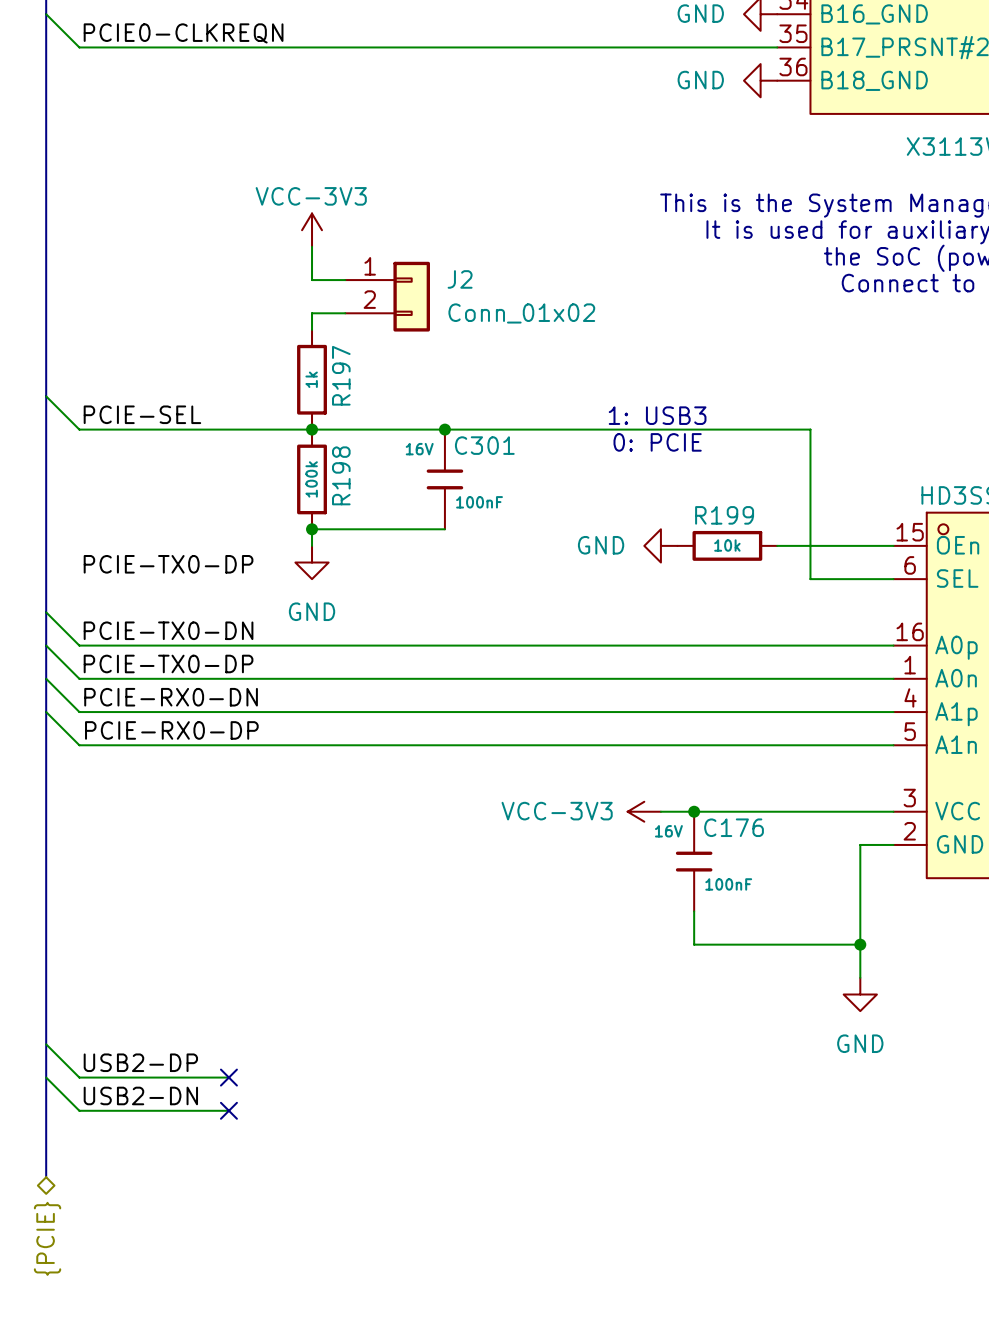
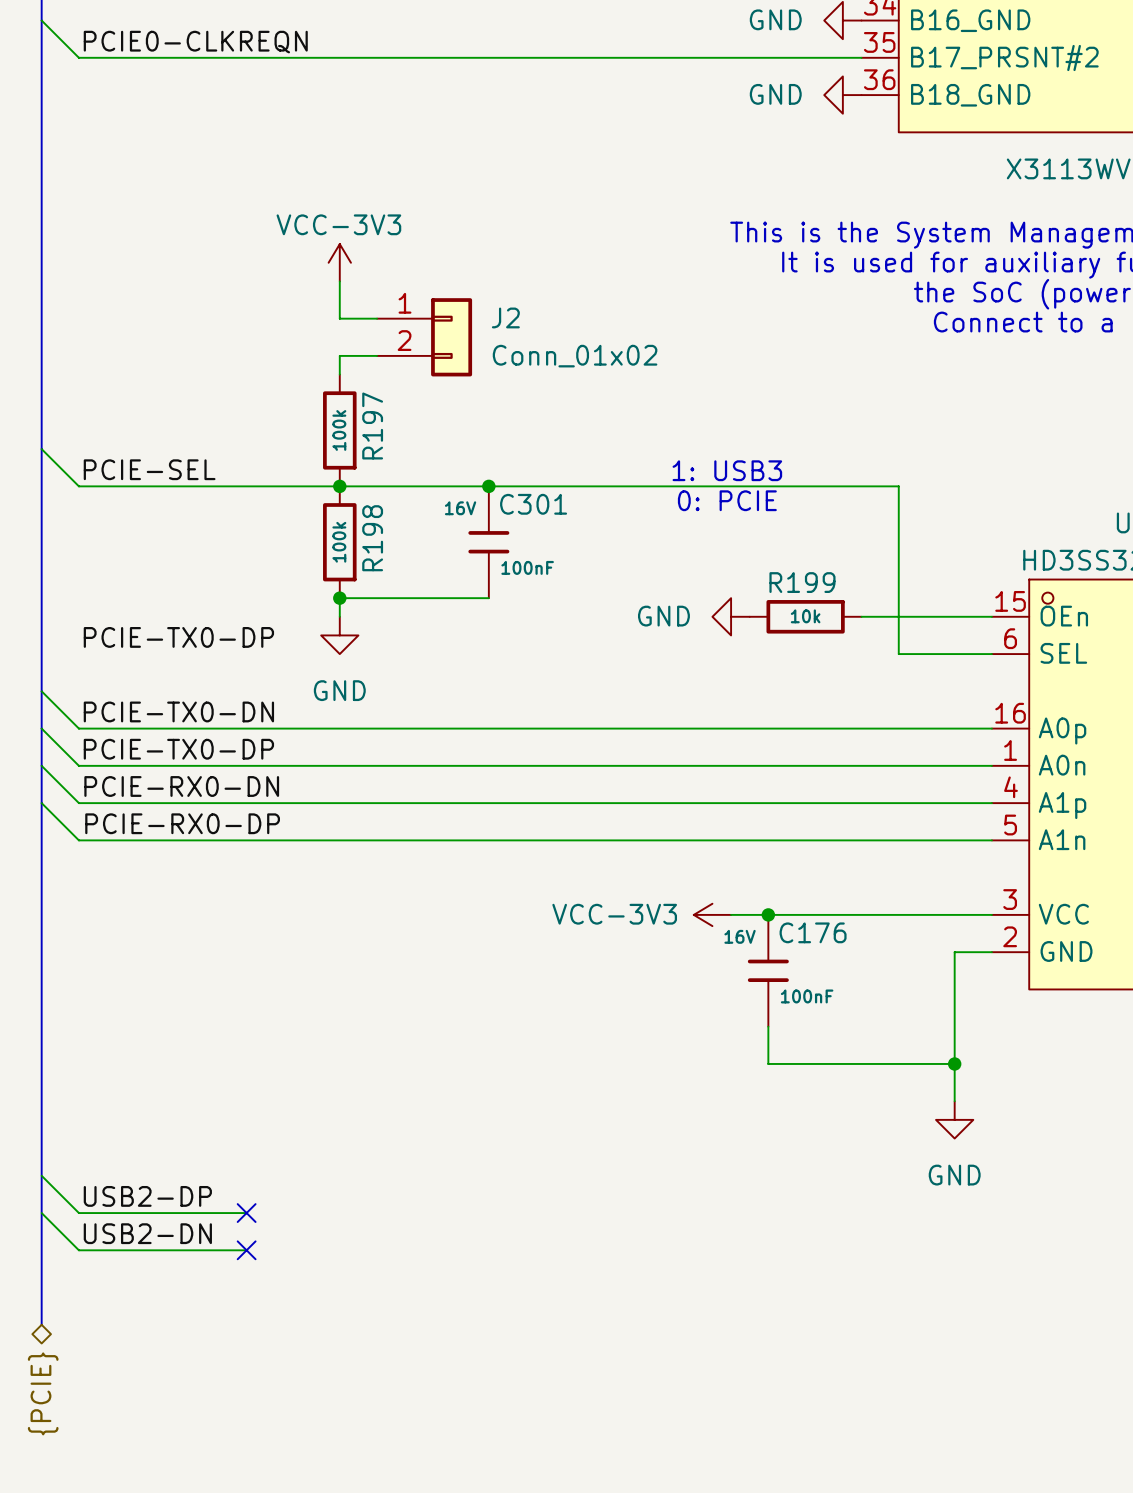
R197 value: 1k (311, 379) -> 100k (339, 430)

